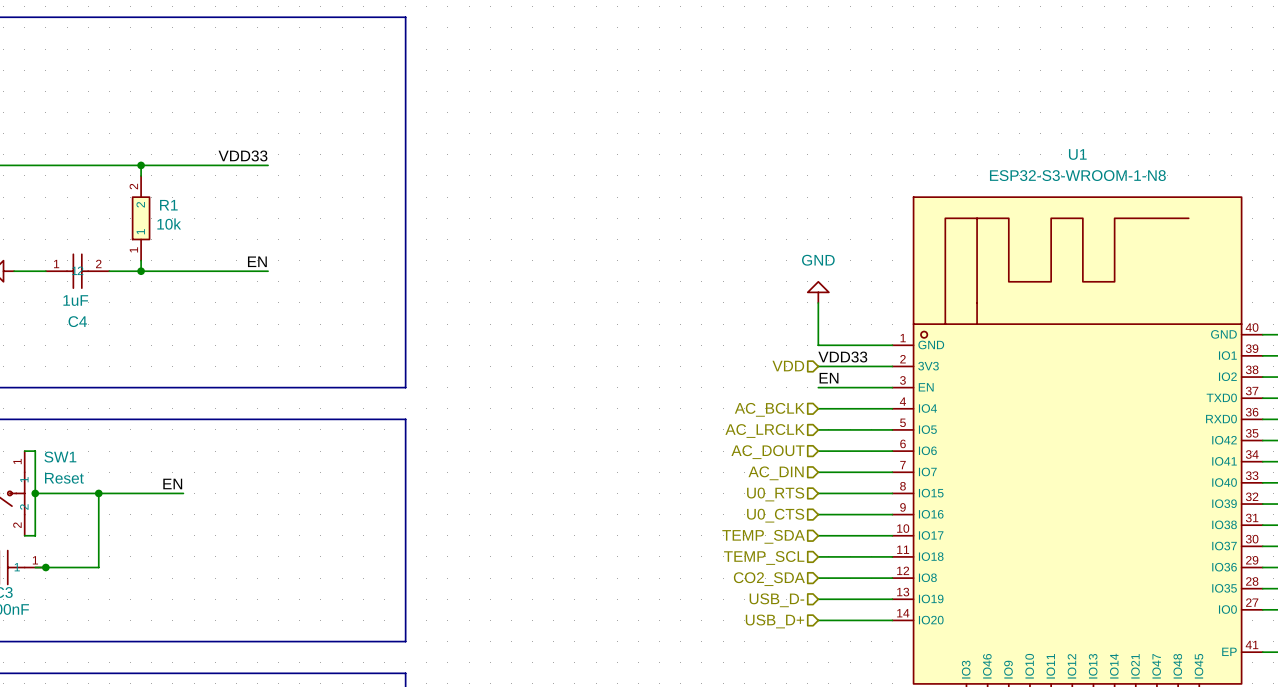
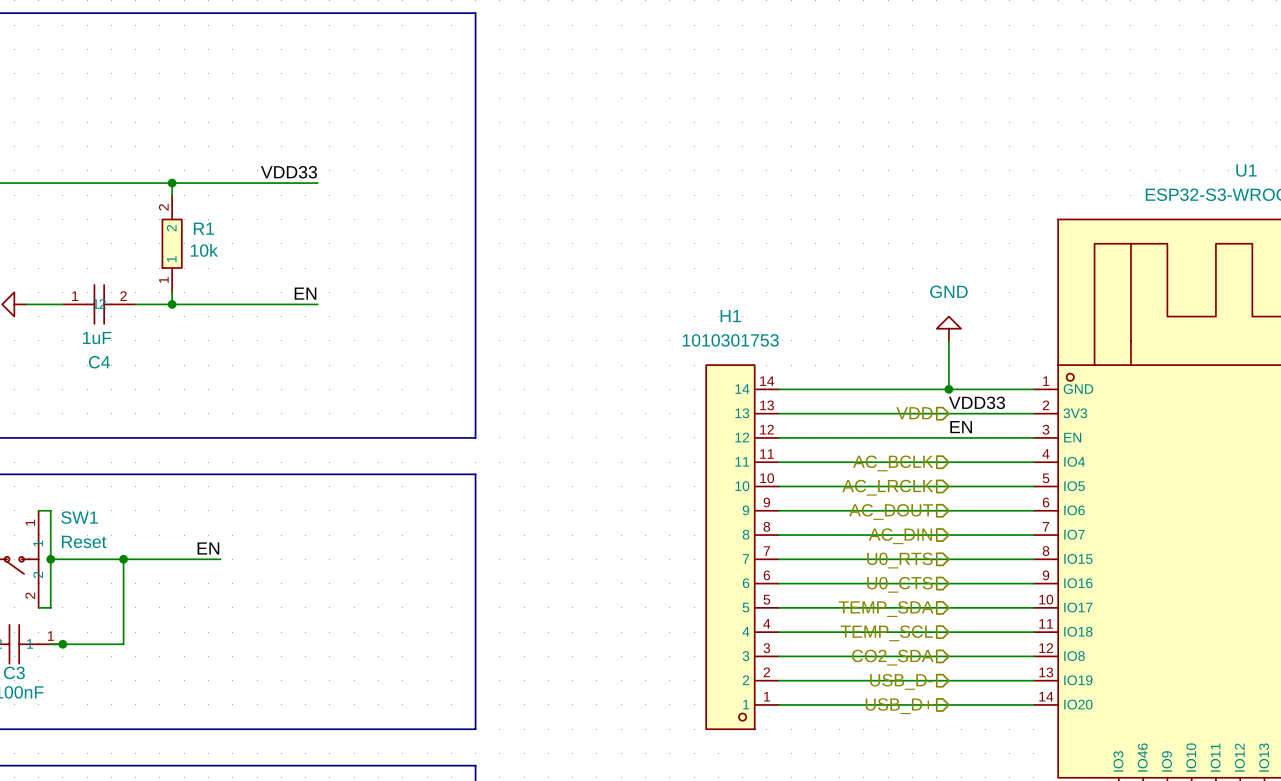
wire: none -> (778, 389) (948, 389)
junction: none -> (948, 389)
wire: none -> (778, 413) (948, 413)
wire: none -> (778, 437) (948, 437)
wire: none -> (778, 462) (948, 462)
wire: none -> (778, 486) (948, 486)
wire: none -> (778, 510) (948, 510)
wire: none -> (778, 535) (948, 535)
H1: none -> 1010301753 (742, 547)
wire: none -> (778, 559) (948, 559)
wire: none -> (778, 583) (948, 583)
wire: none -> (778, 607) (948, 607)
wire: none -> (778, 632) (948, 632)
wire: none -> (778, 656) (948, 656)
wire: none -> (778, 680) (948, 680)
wire: none -> (778, 704) (948, 704)

